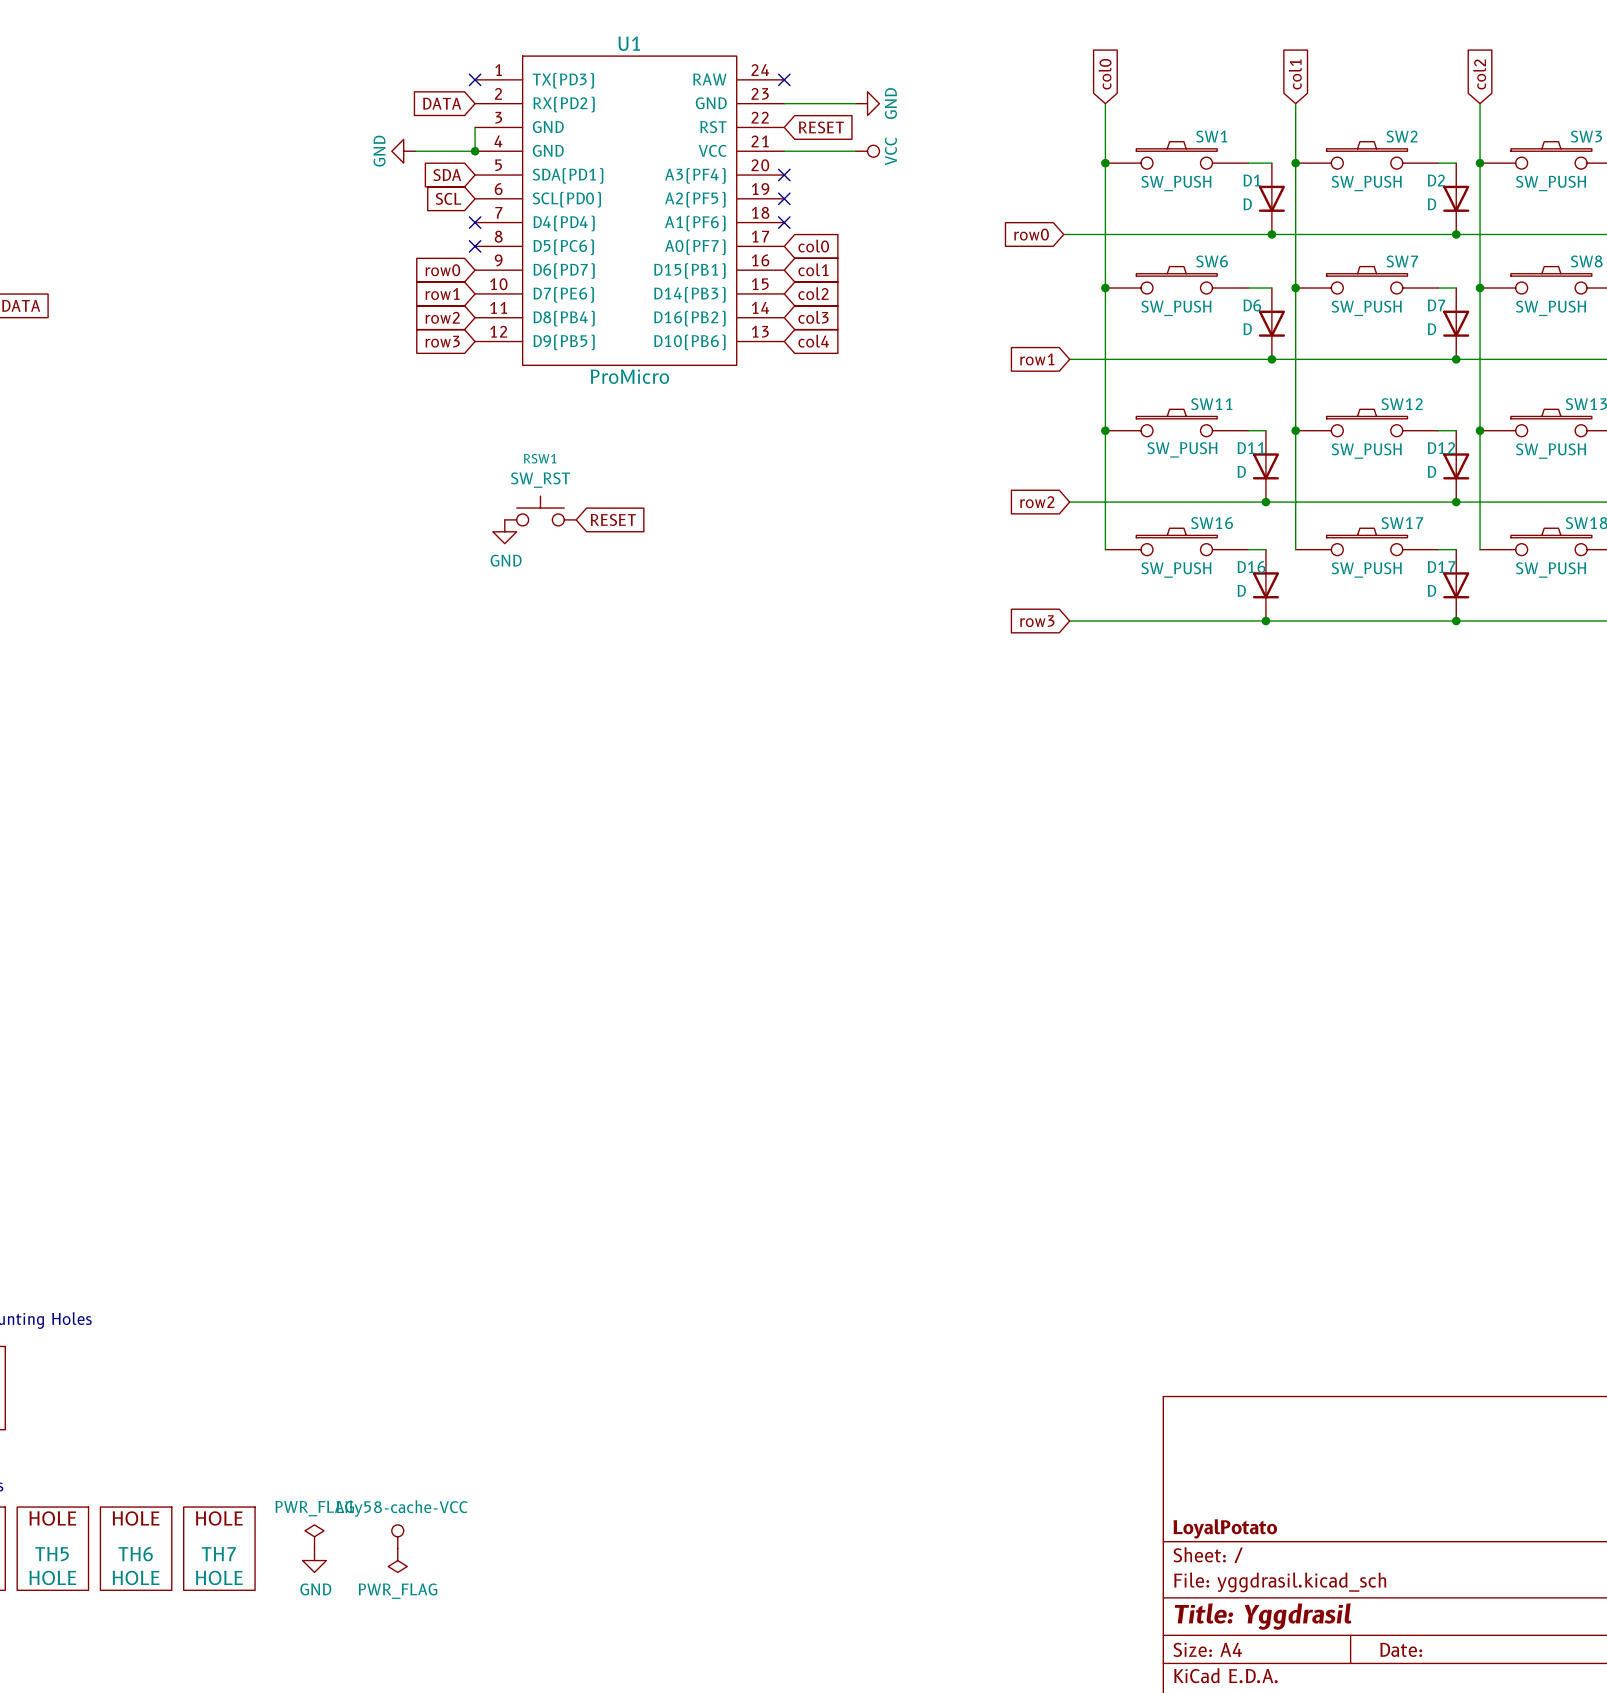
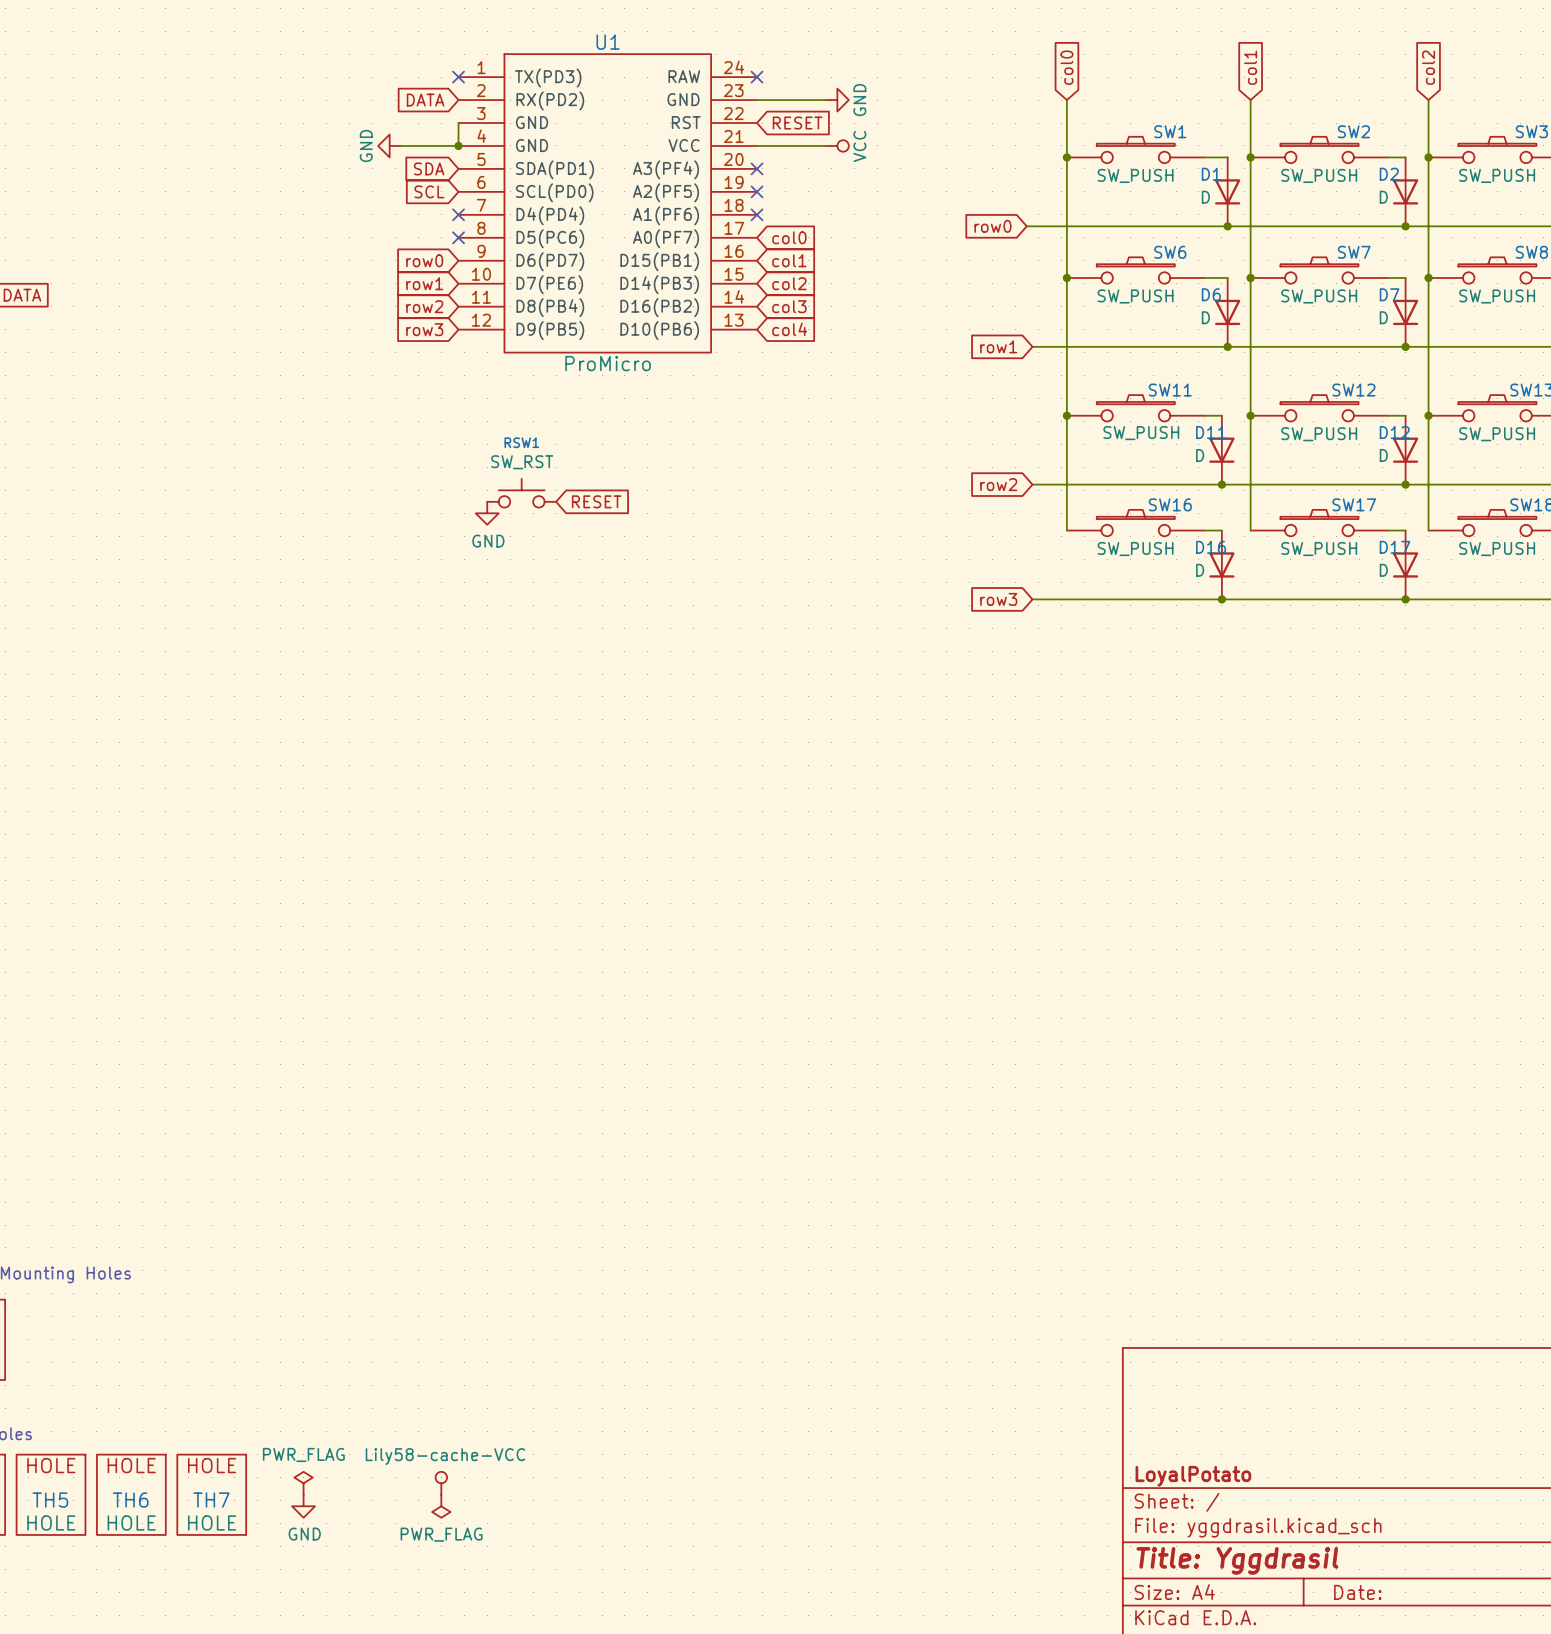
power symbol position: Lily58-cache-VCC (397, 1536) -> Lily58-cache-VCC (441, 1483)
power symbol position: PWR_FLAG (397, 1560) -> PWR_FLAG (441, 1506)

